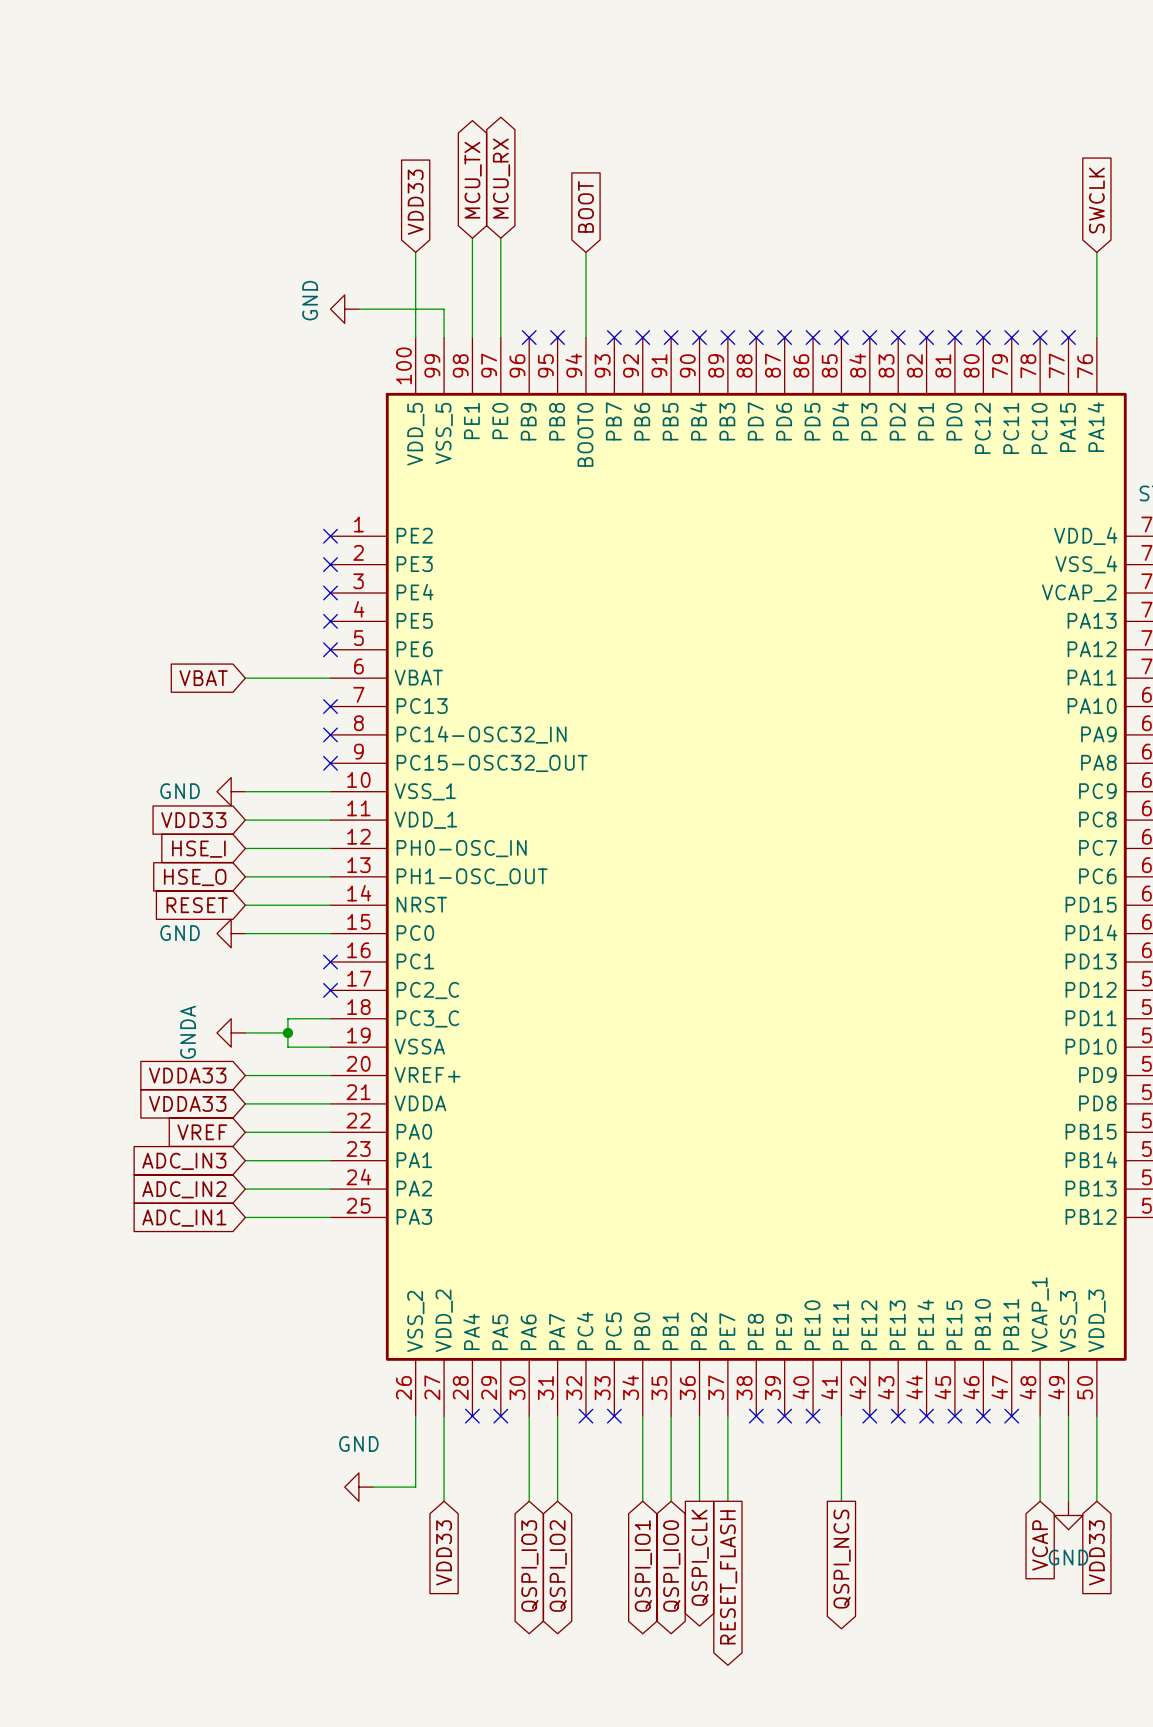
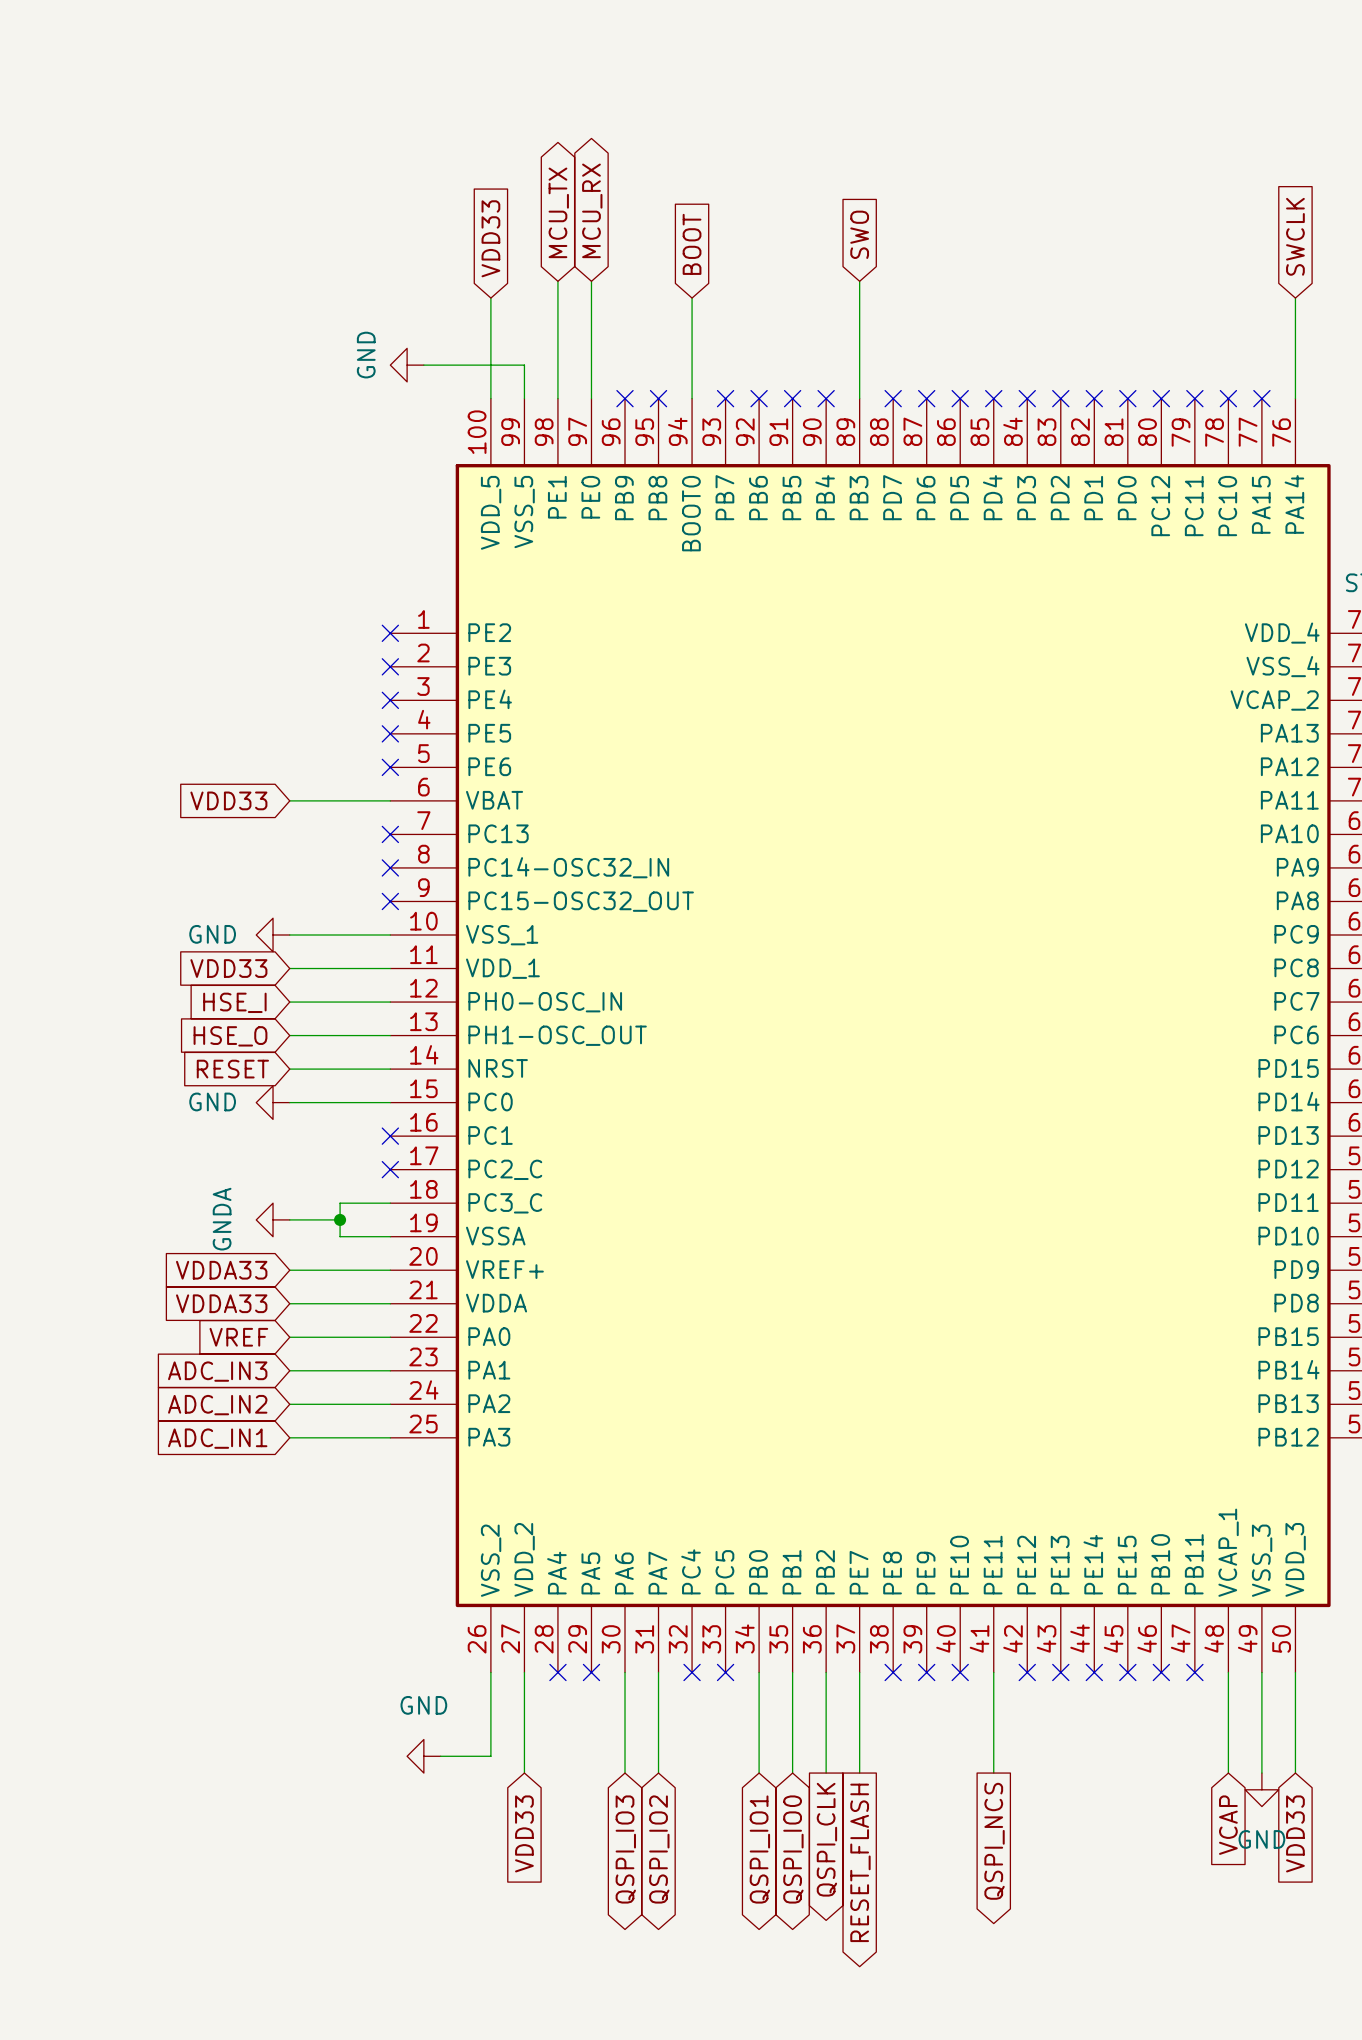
global label: none -> SWO (859, 234)
wire: none -> (859, 281) (859, 398)
no-connect mark: (727, 337) -> none
global label: VBAT (203, 678) -> VDD33 (228, 800)

